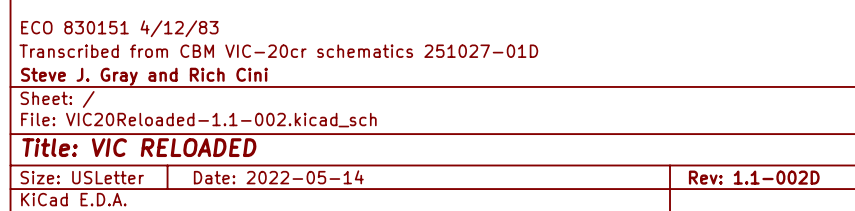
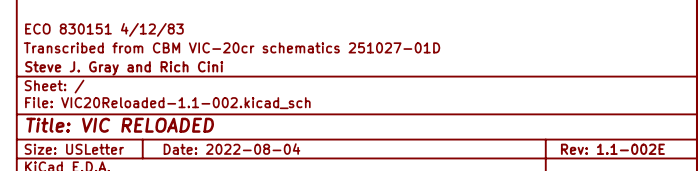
title block: Date: 2022-05-14 (278, 177) -> Date: 2022-08-04 (231, 149)
title block: Rev: 1.1-002D (754, 177) -> Rev: 1.1-002E (612, 149)

